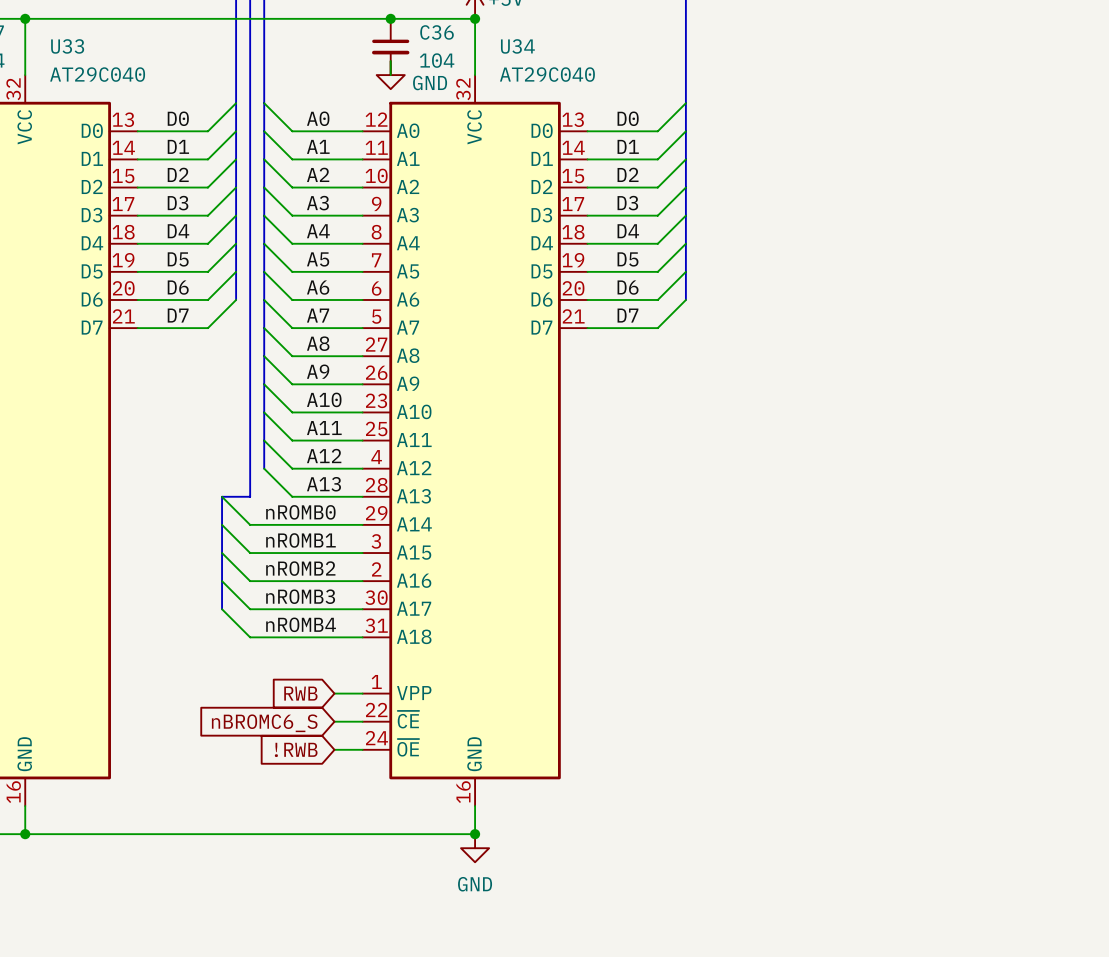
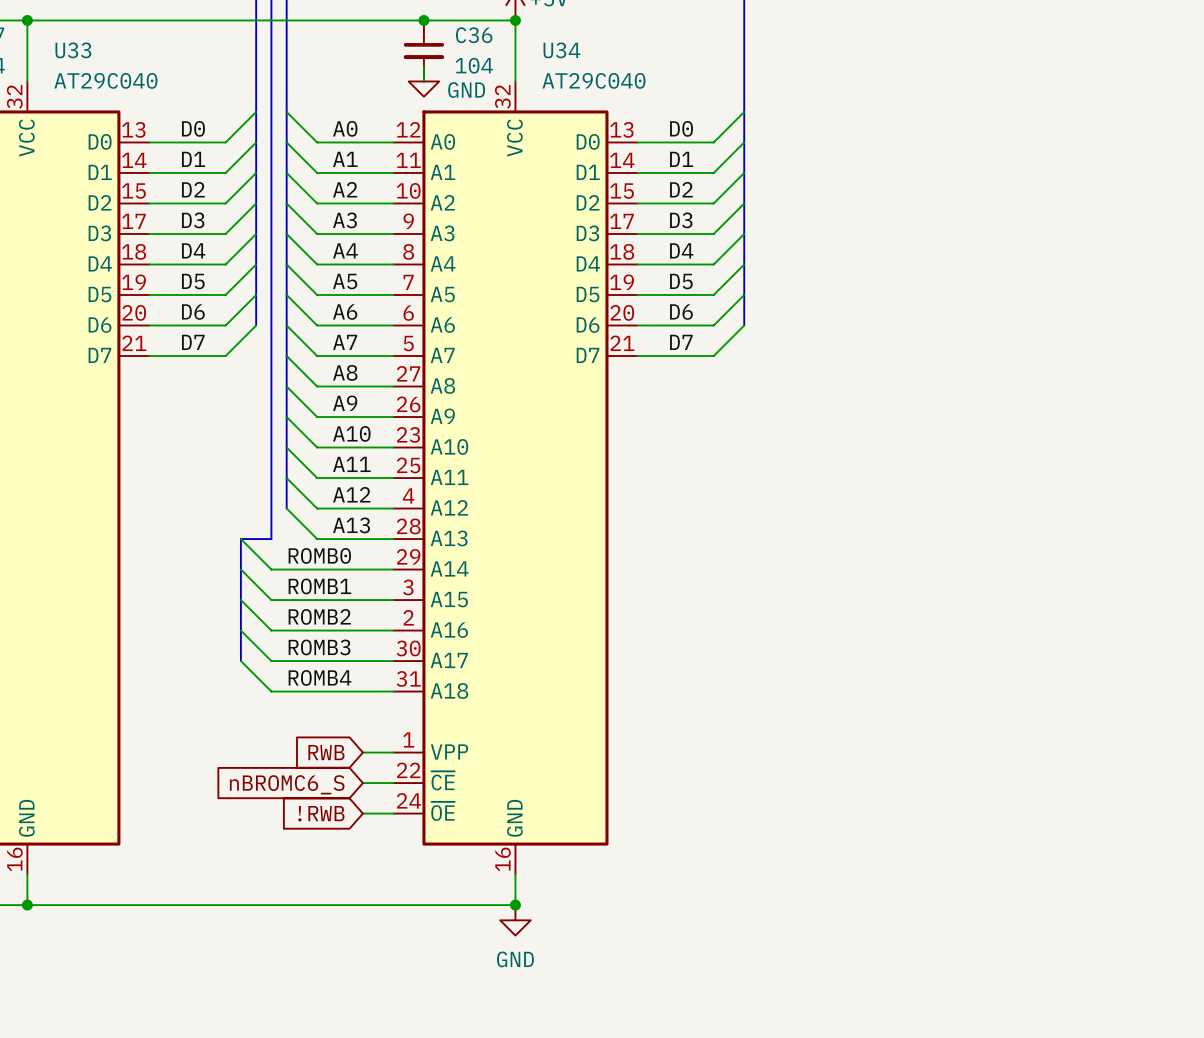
label: nROMB0 (300, 512) -> ROMB0 (319, 555)
label: nROMB1 (300, 540) -> ROMB1 (319, 586)
label: nROMB2 (300, 568) -> ROMB2 (319, 616)
label: nROMB3 (300, 596) -> ROMB3 (319, 647)
label: nROMB4 (301, 624) -> ROMB4 (320, 677)

